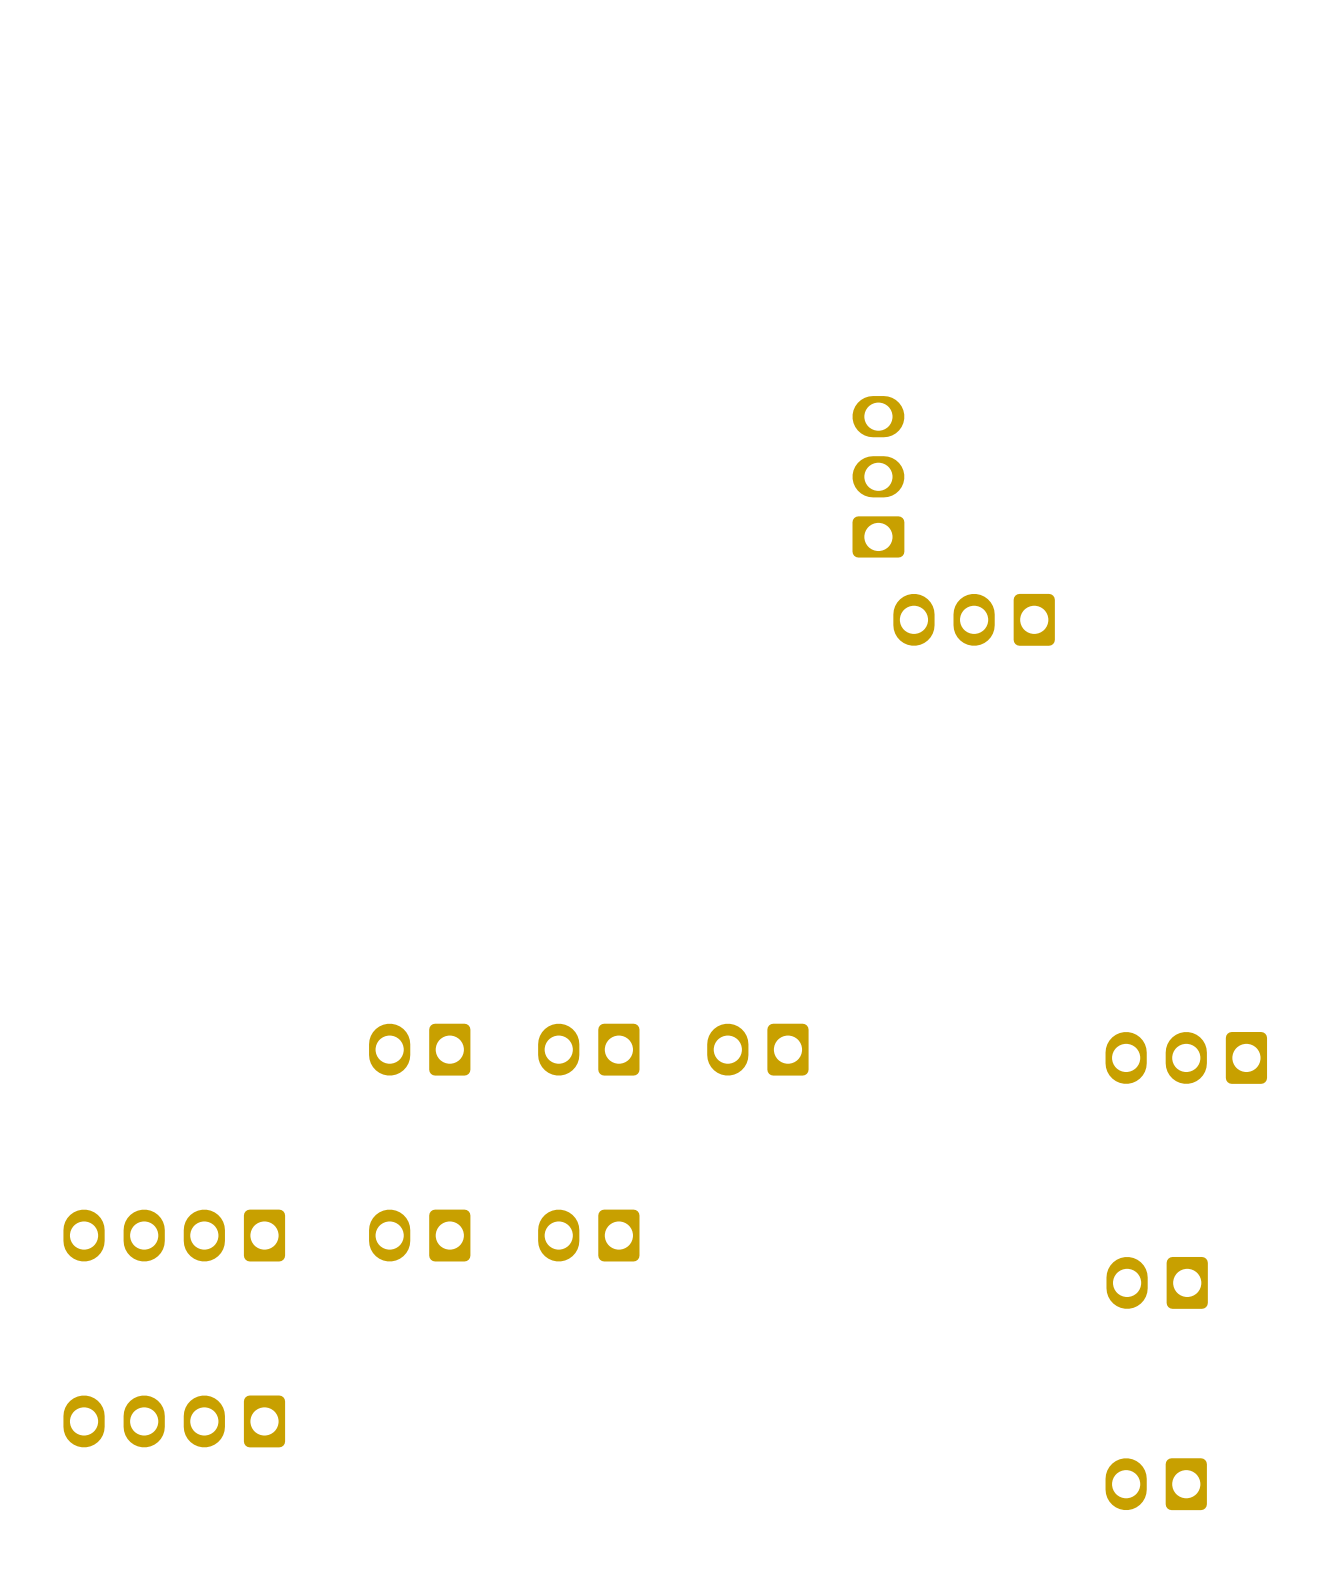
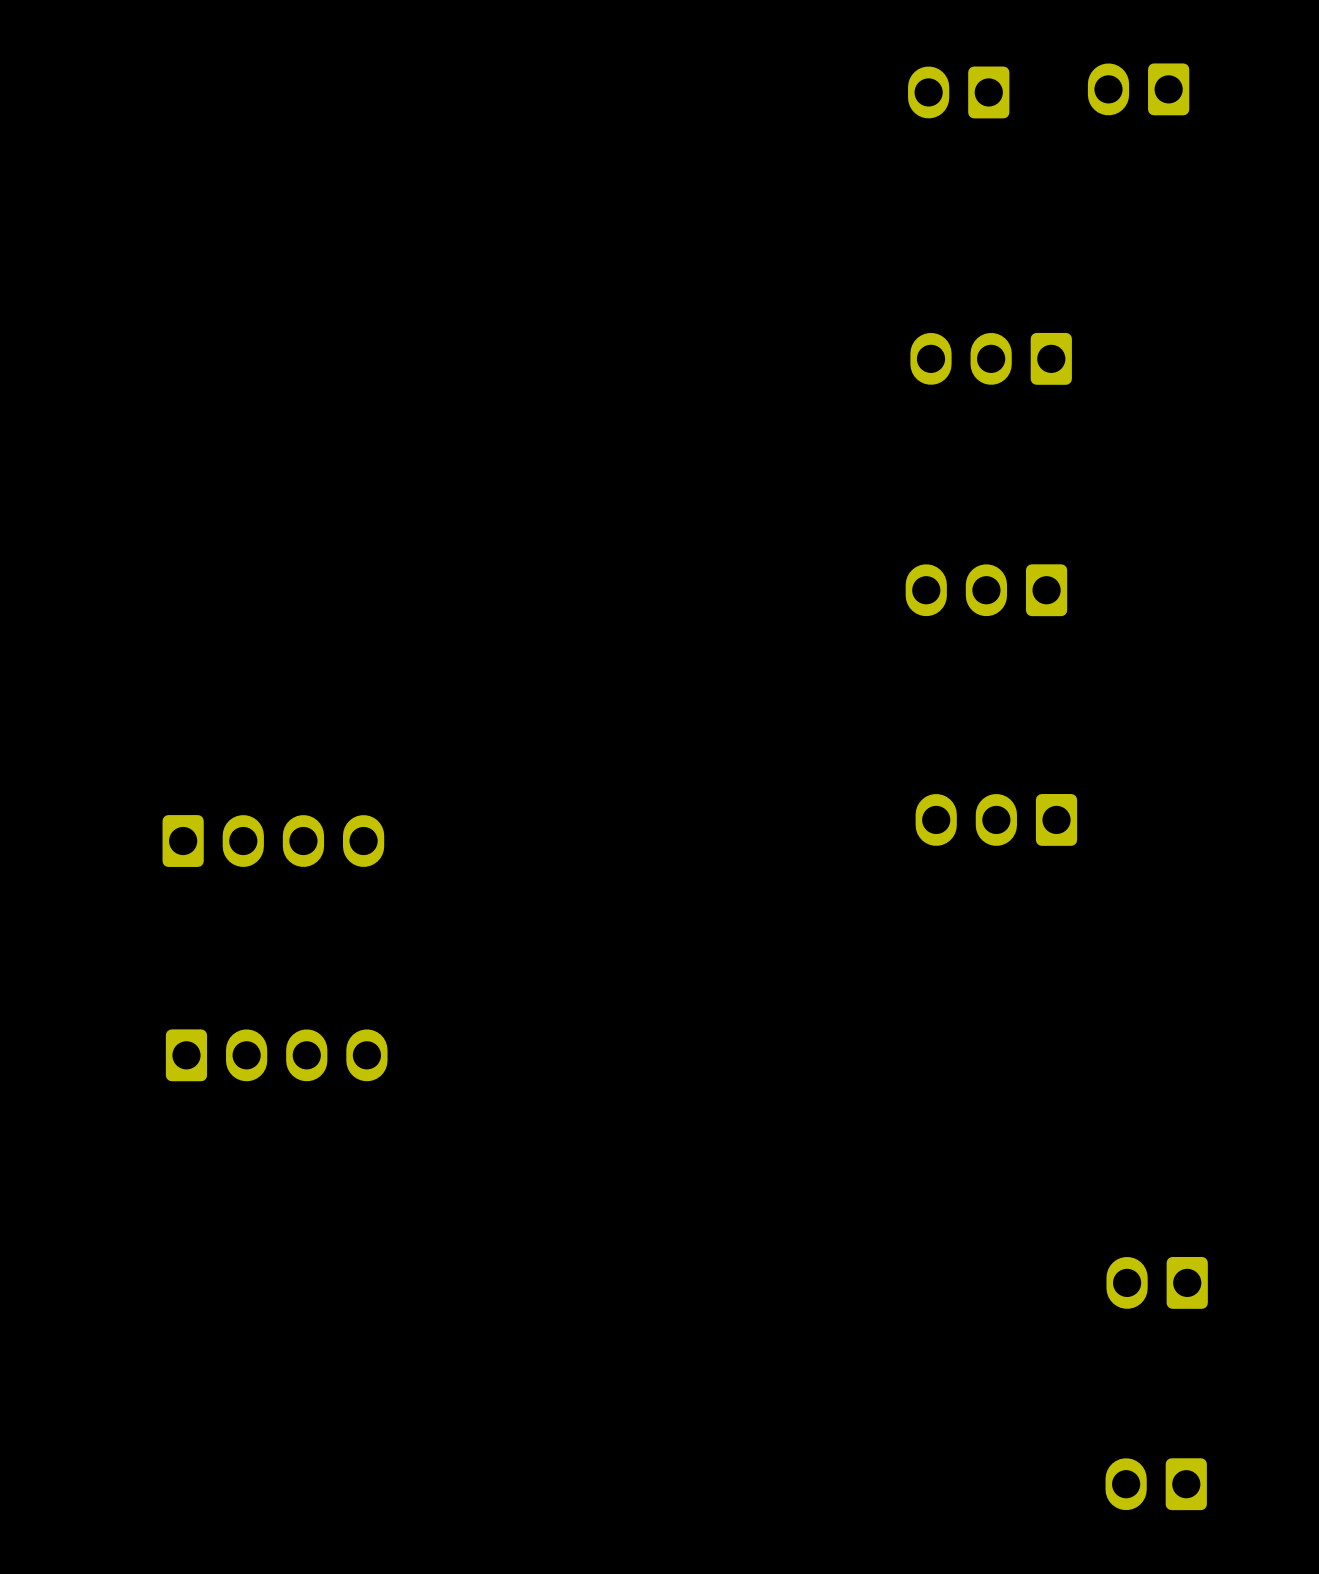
part: none -> (1138, 89)
part: none -> (958, 92)
part: none -> (991, 358)
part: (878, 476) -> none
part position: (974, 619) -> (986, 590)
part: none -> (996, 819)
part: none -> (273, 841)
part: (419, 1049) -> none
part: (588, 1049) -> none
part: (757, 1049) -> none
part: none -> (276, 1055)
part: (1186, 1057) -> none
part: (174, 1235) -> none
part: (419, 1235) -> none
part: (588, 1235) -> none
part: (174, 1421) -> none

